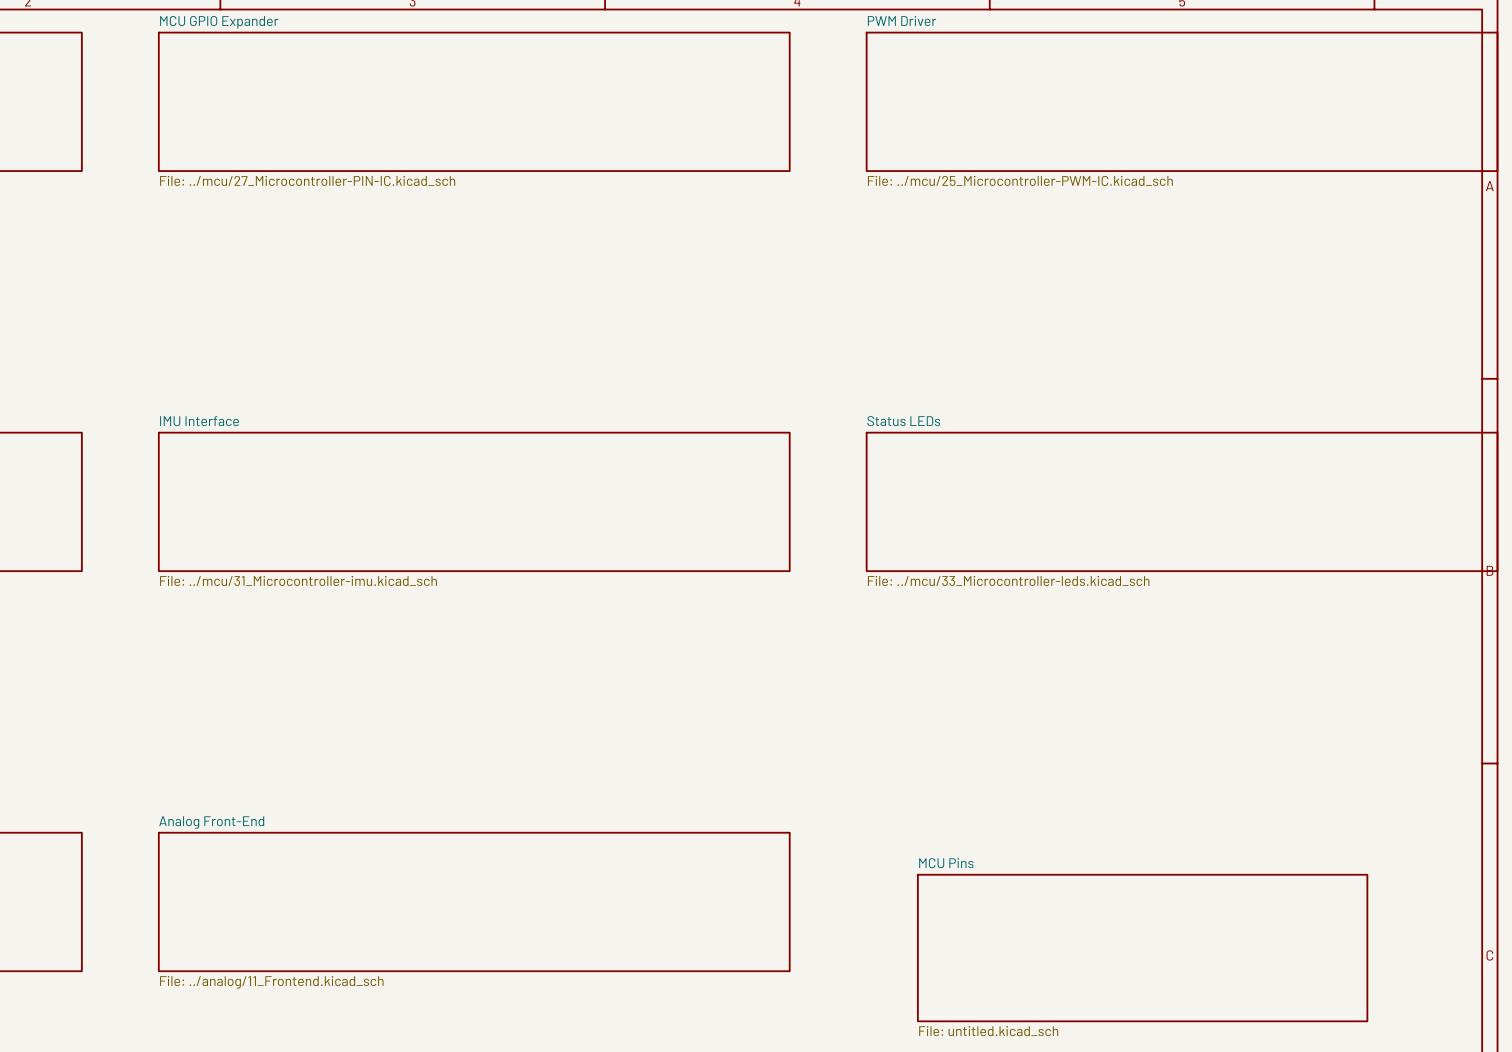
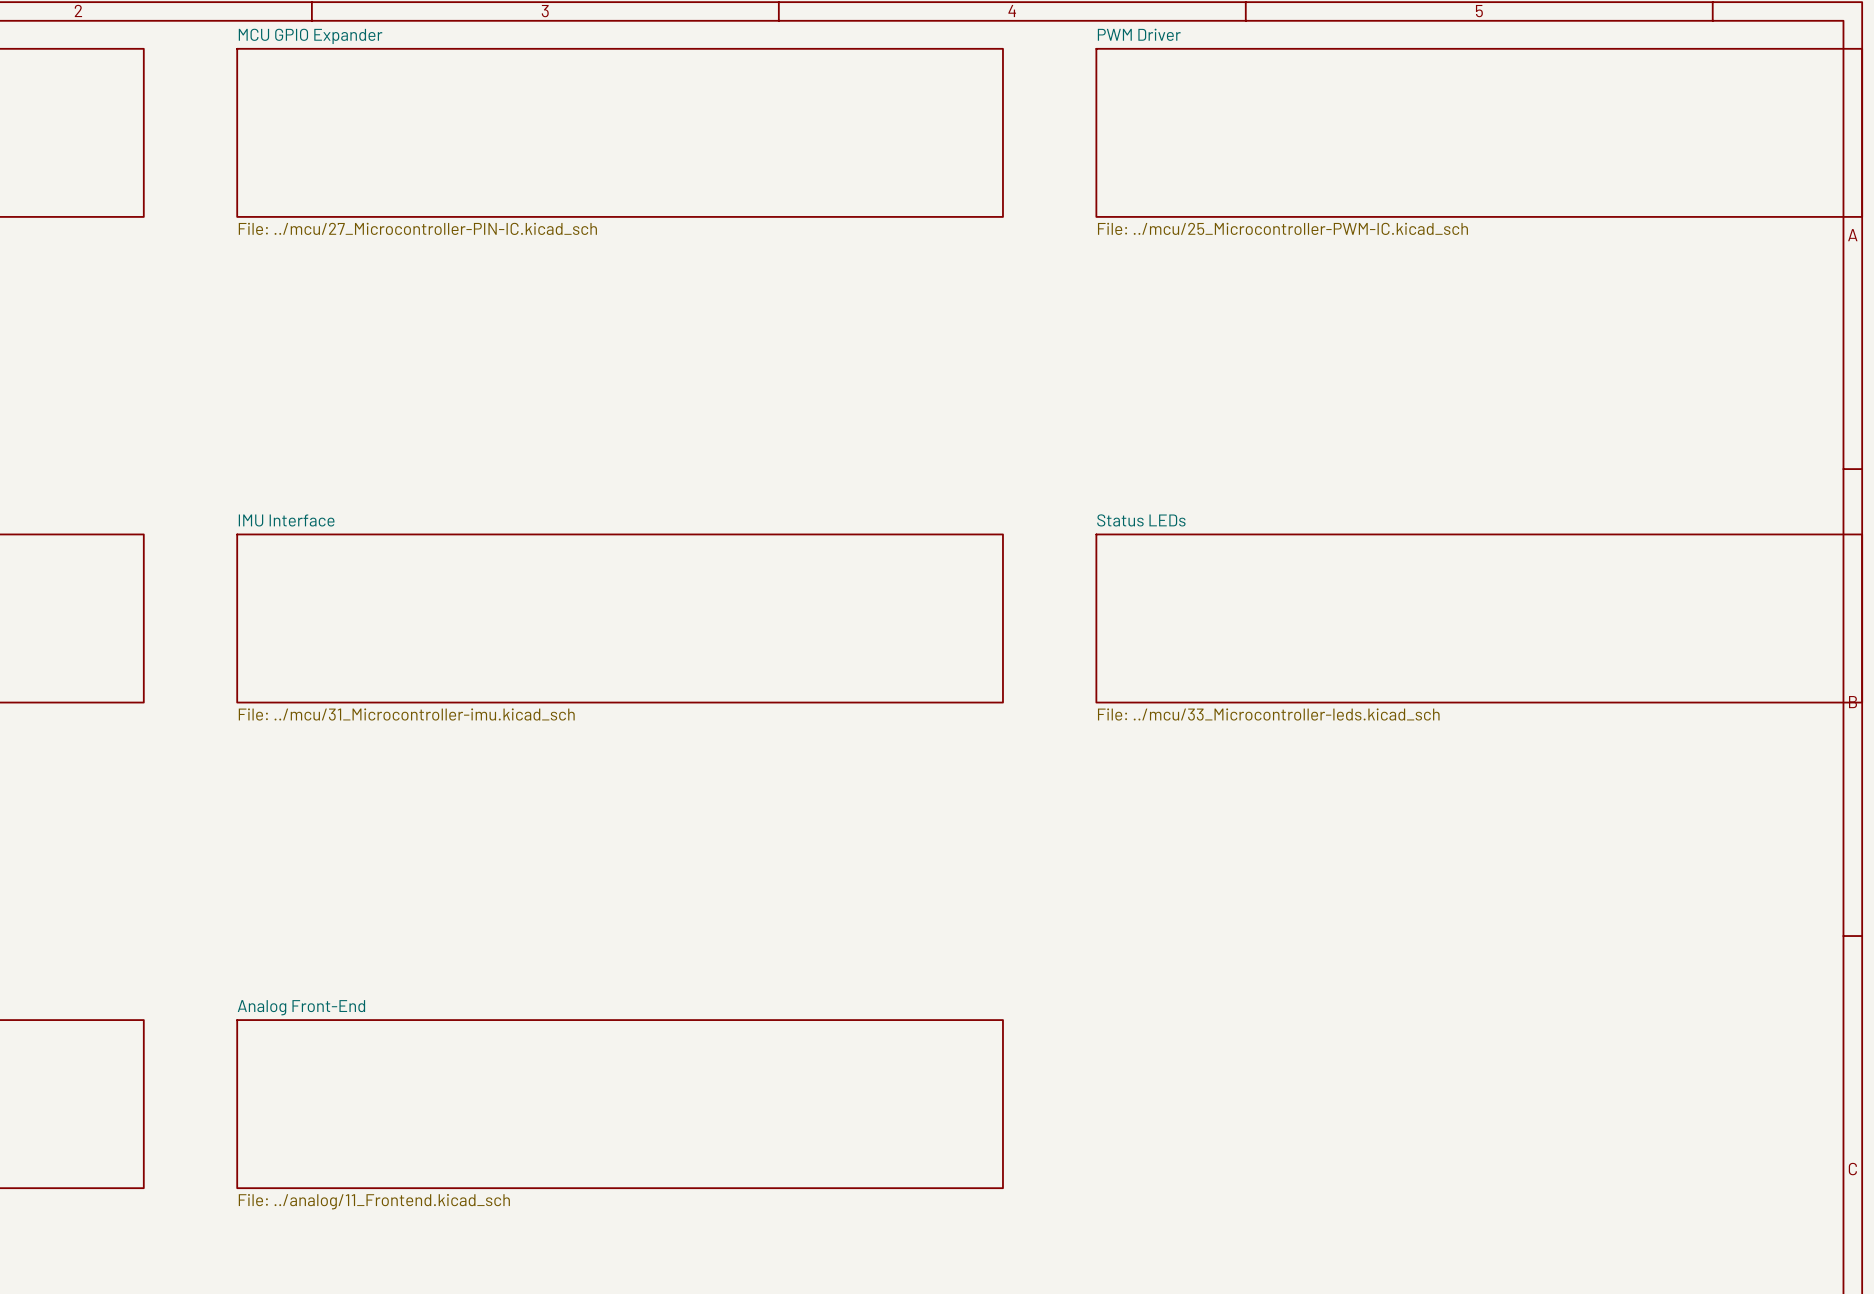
sheet MCU Pins: File: untitled.kicad_sch (1142, 948) -> none

